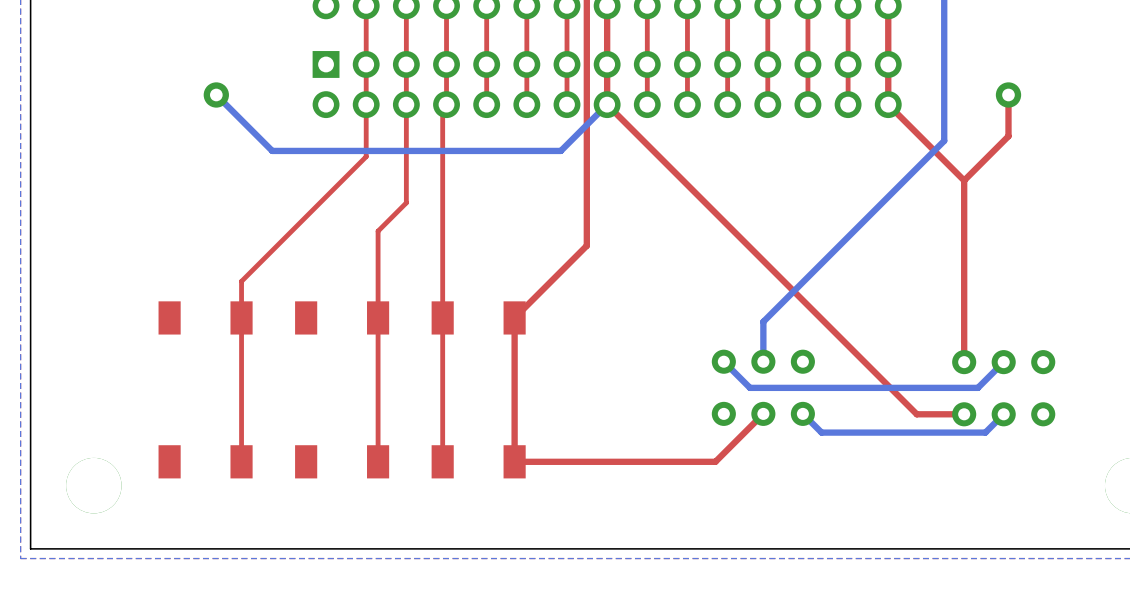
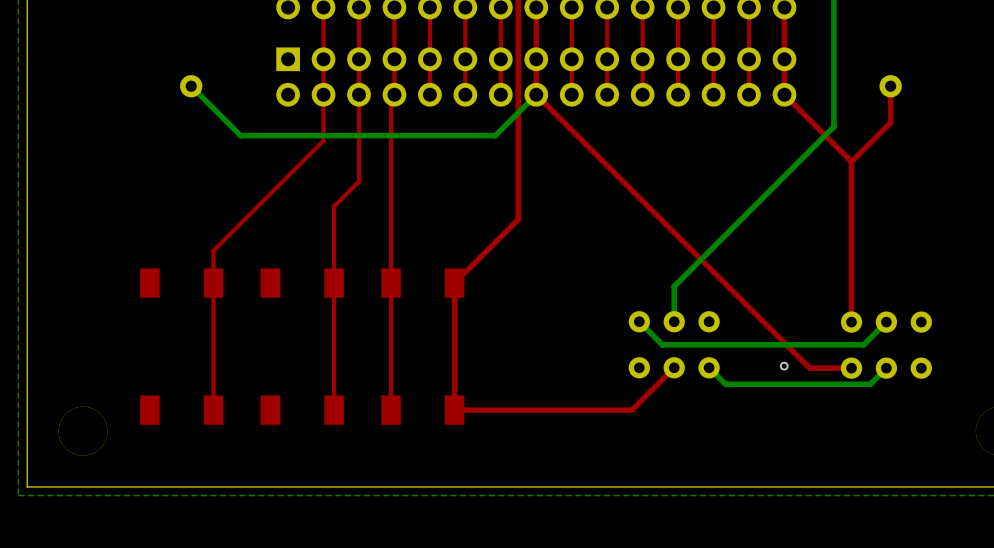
via: none -> (784, 366)

